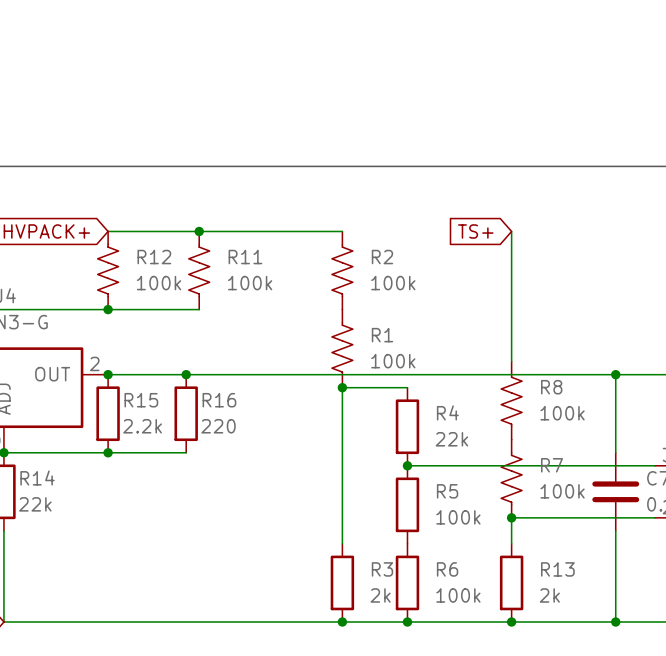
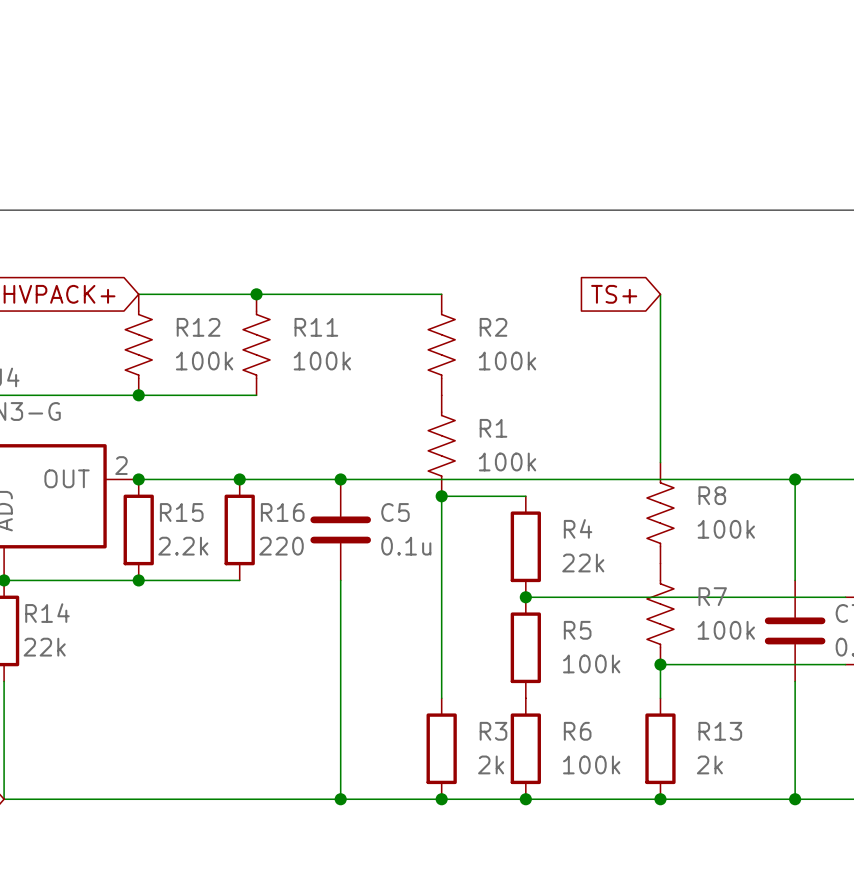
junction: none -> (340, 479)
C5: none -> 0.1u (340, 529)
wire: none -> (340, 580) (340, 799)
junction: none -> (340, 799)

